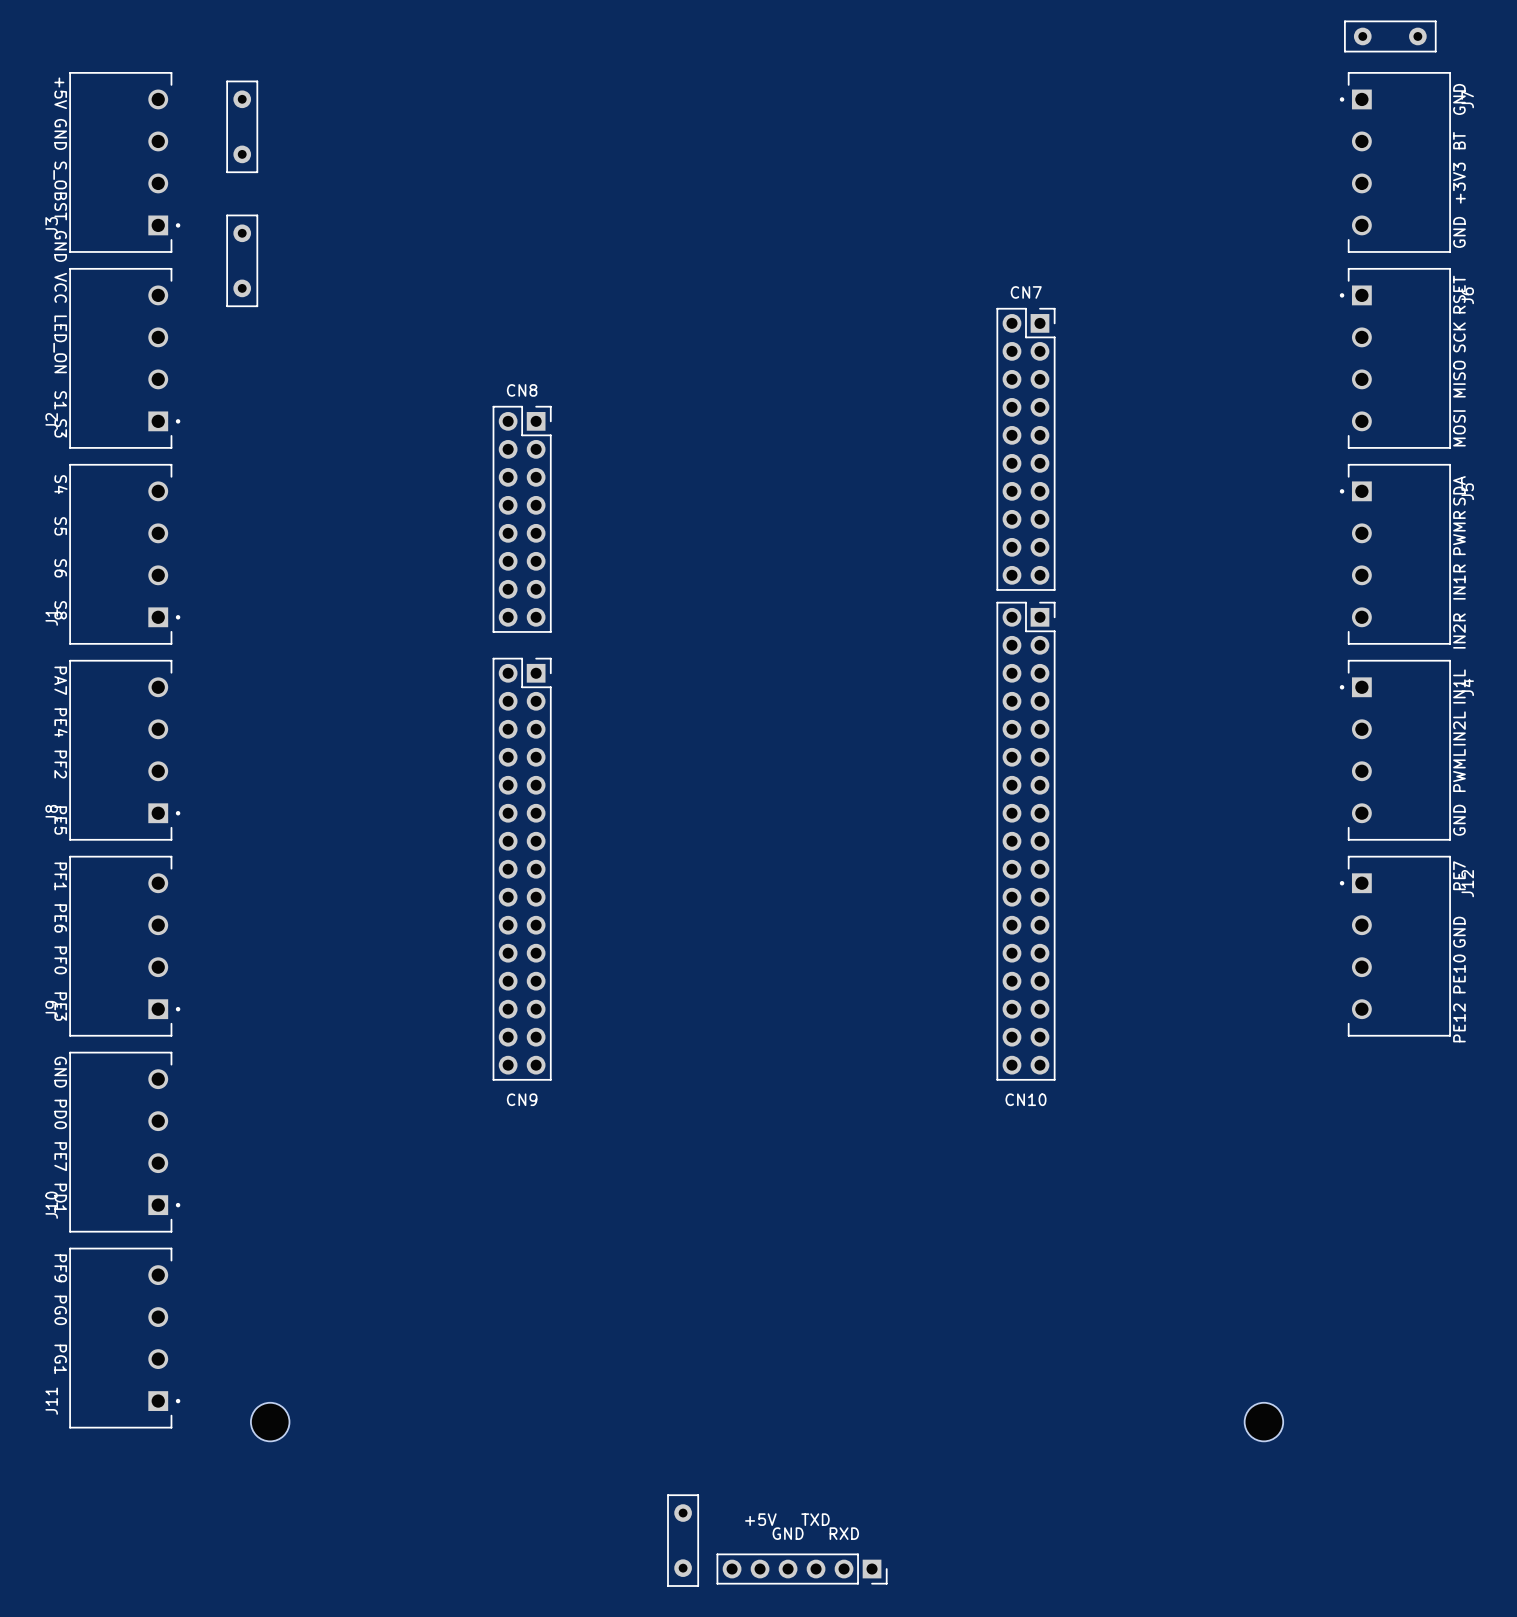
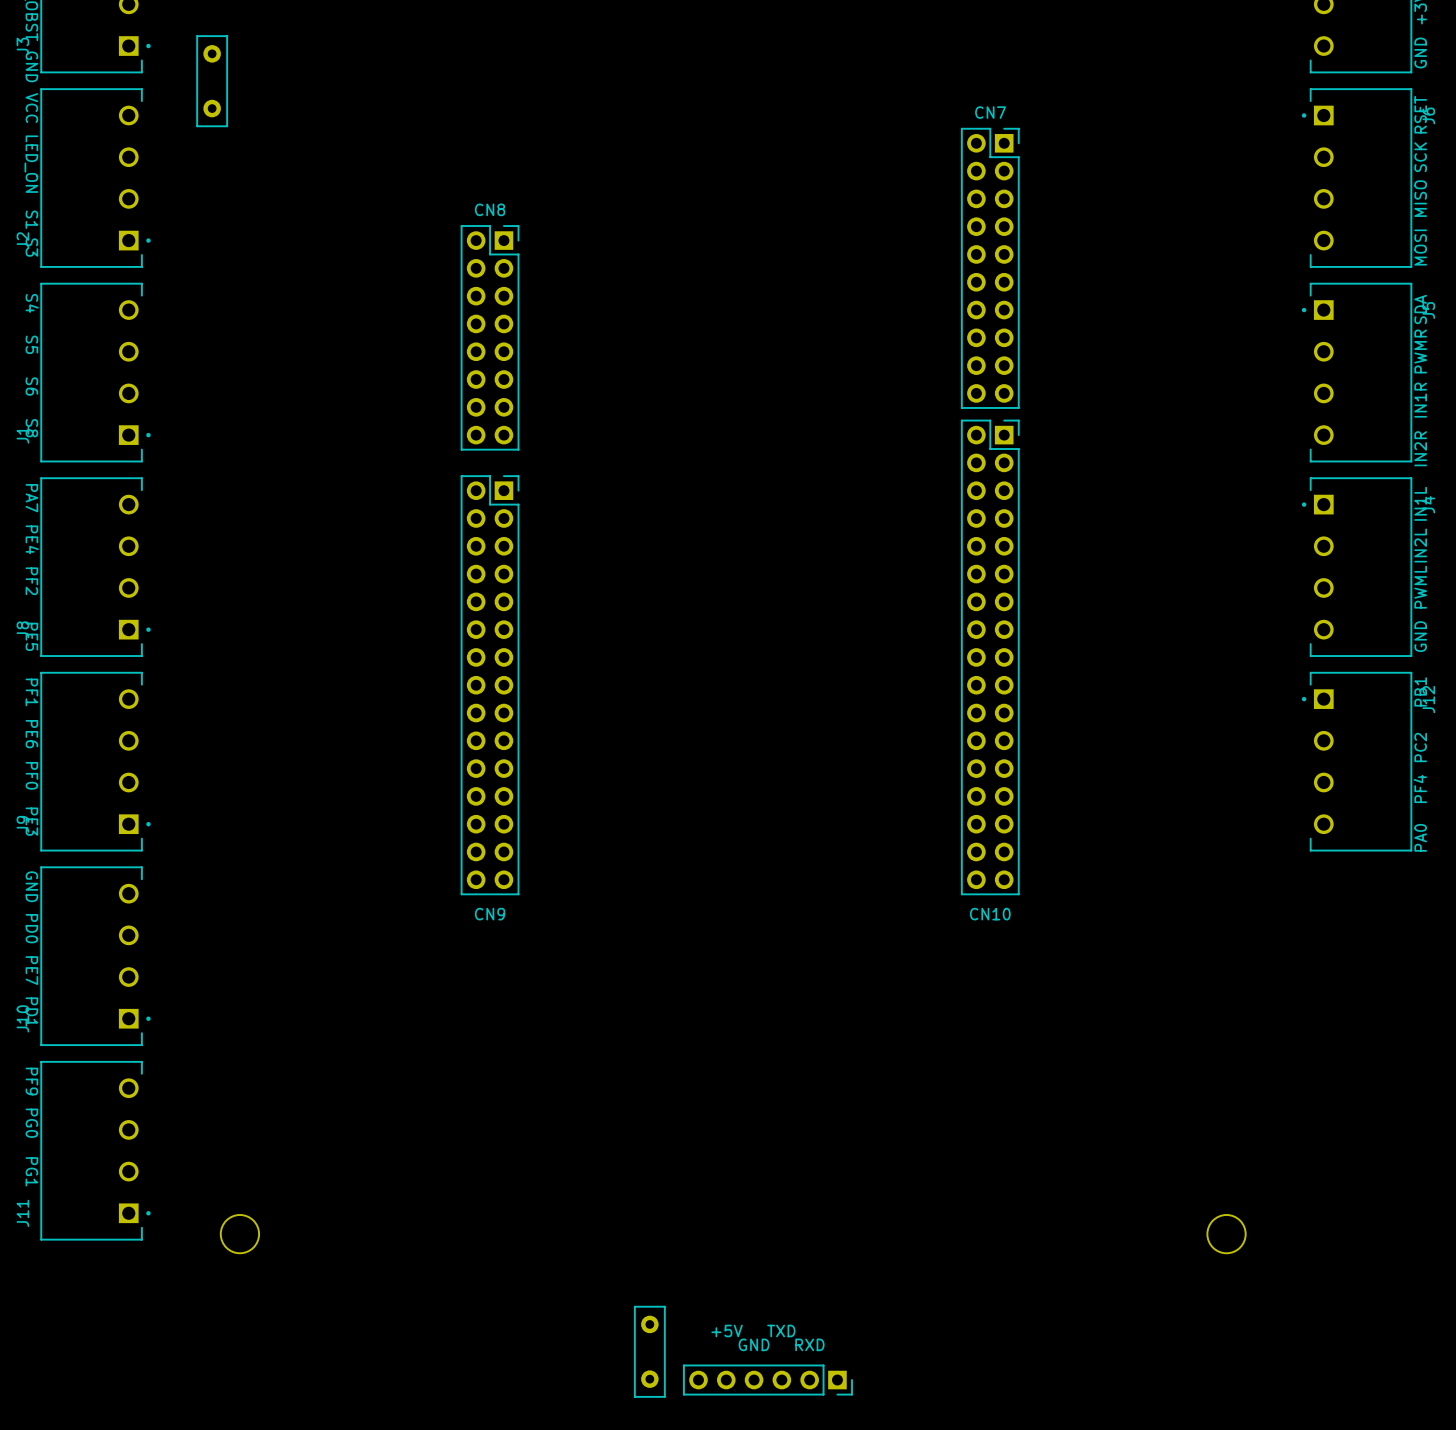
text: PE7 (1459, 875) -> PB1 (1420, 691)
text: GND (1459, 932) -> PC2 (1420, 747)
text: PE10 (1459, 973) -> PF4 (1420, 788)
text: PE12 (1459, 1022) -> PA0 (1420, 837)

